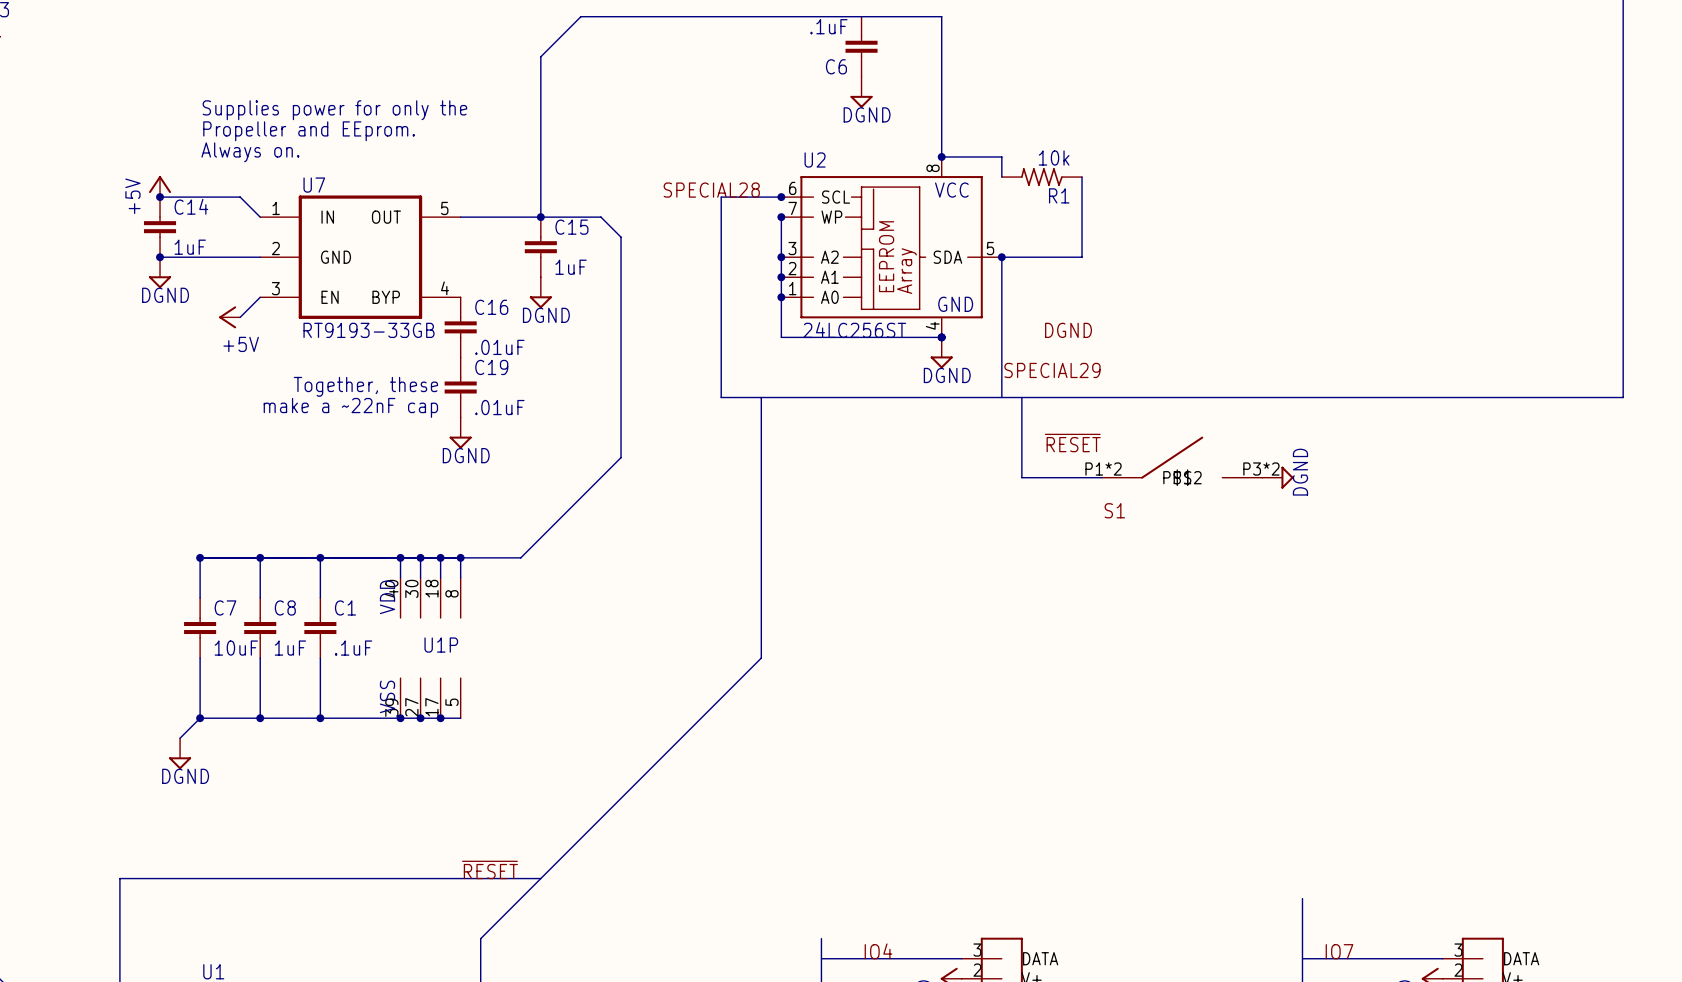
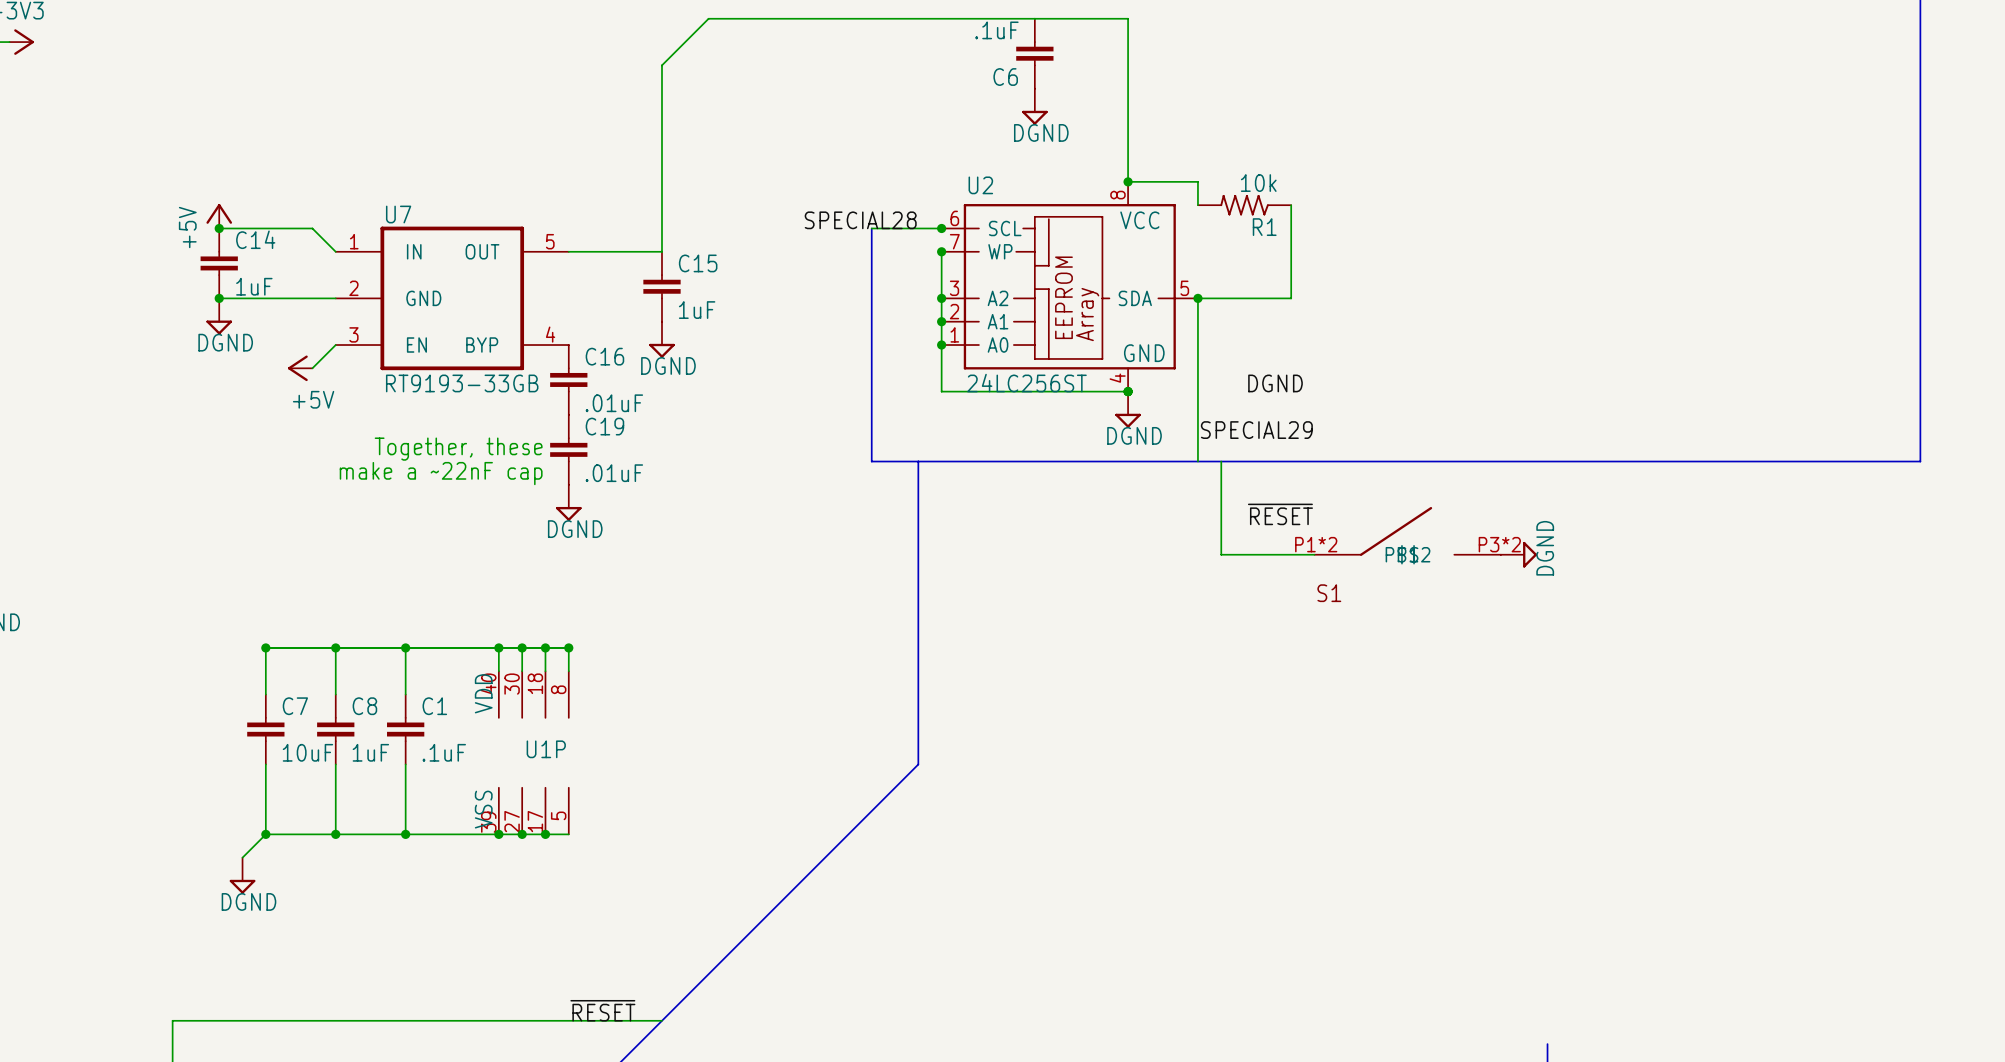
text: Supplies power for only the (334, 110) -> none
text: Propeller and EEprom. (309, 131) -> none
text: Always on. (250, 152) -> none
wire: (540, 217) (600, 217) (621, 237) (621, 457) (520, 557) (460, 557) -> none
junction: (540, 217) -> none

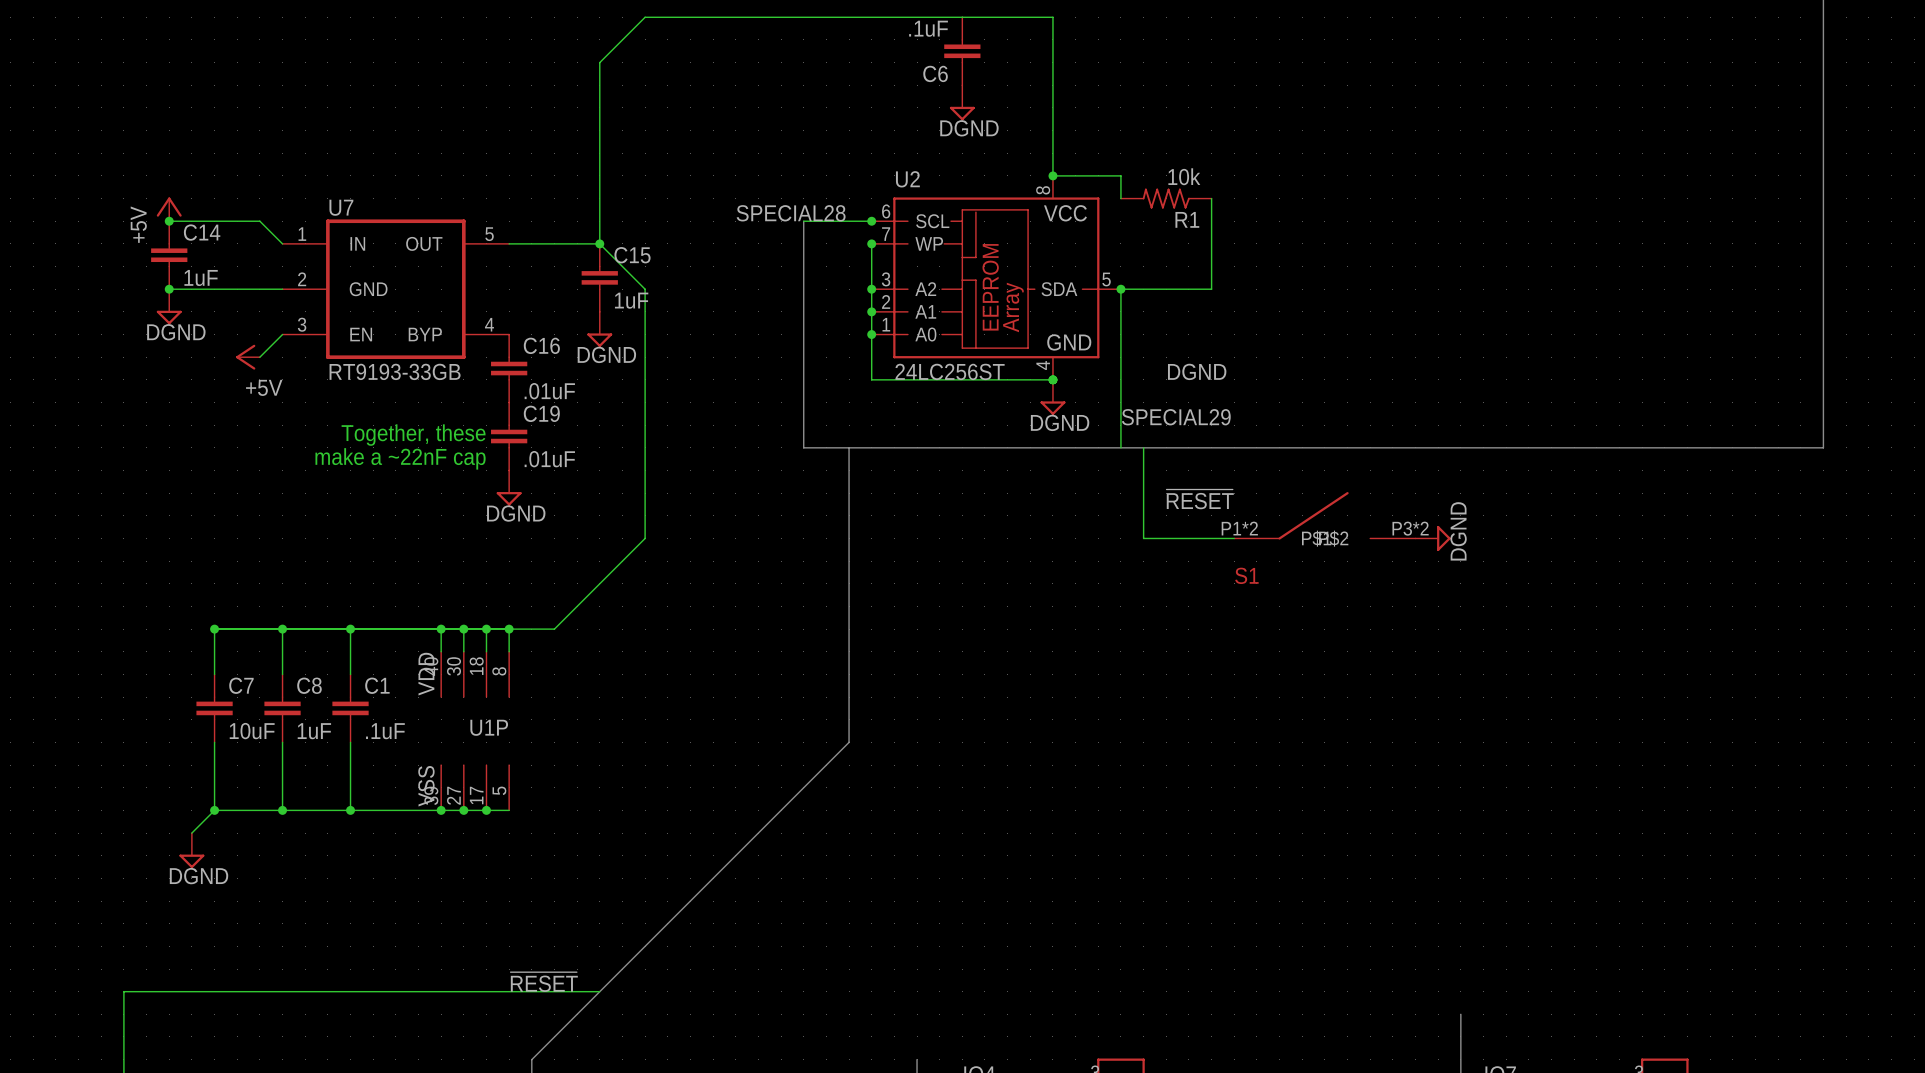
wire: none -> (599, 243) (645, 289) (645, 538) (554, 629) (509, 629)
junction: none -> (599, 243)

